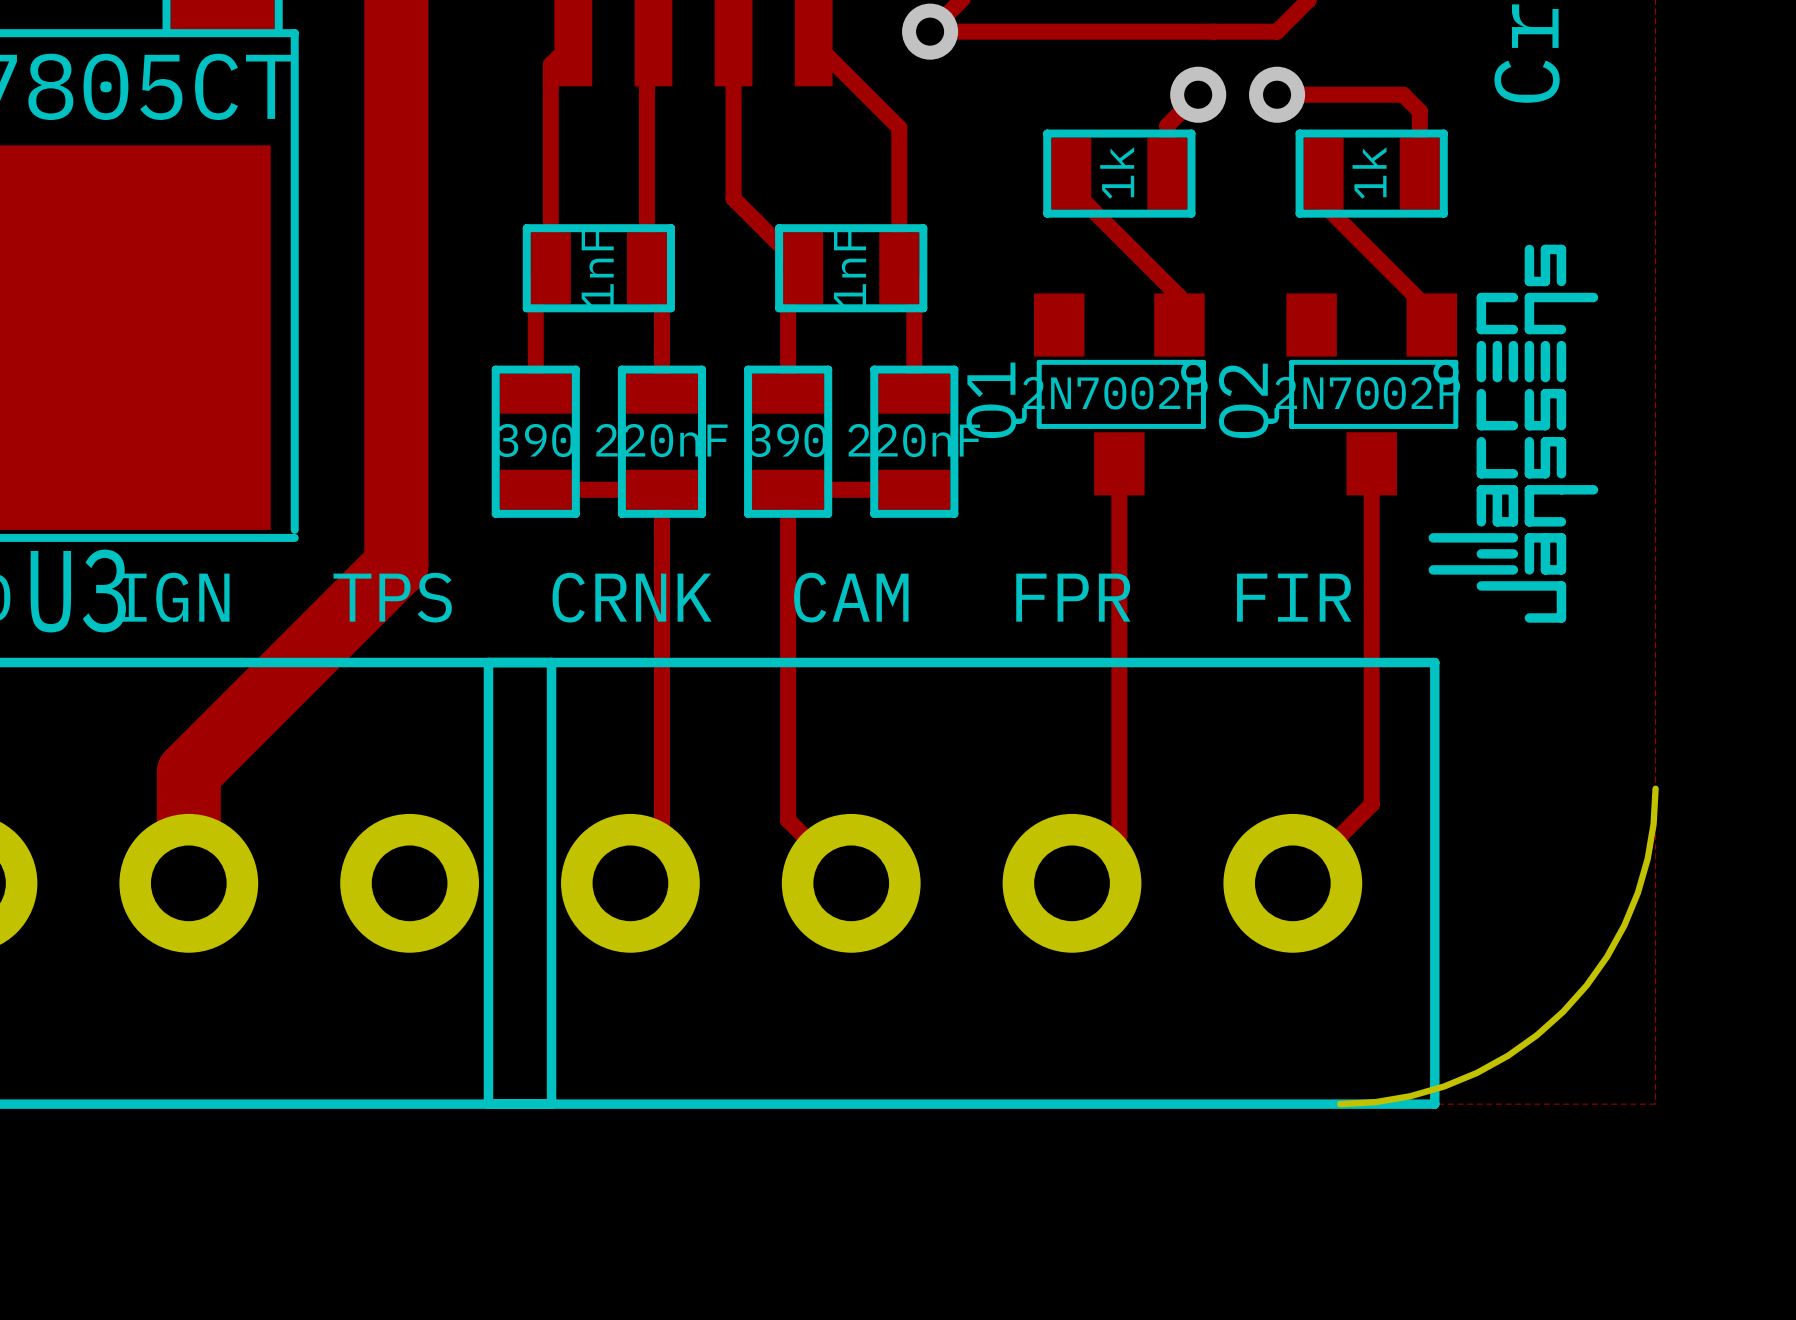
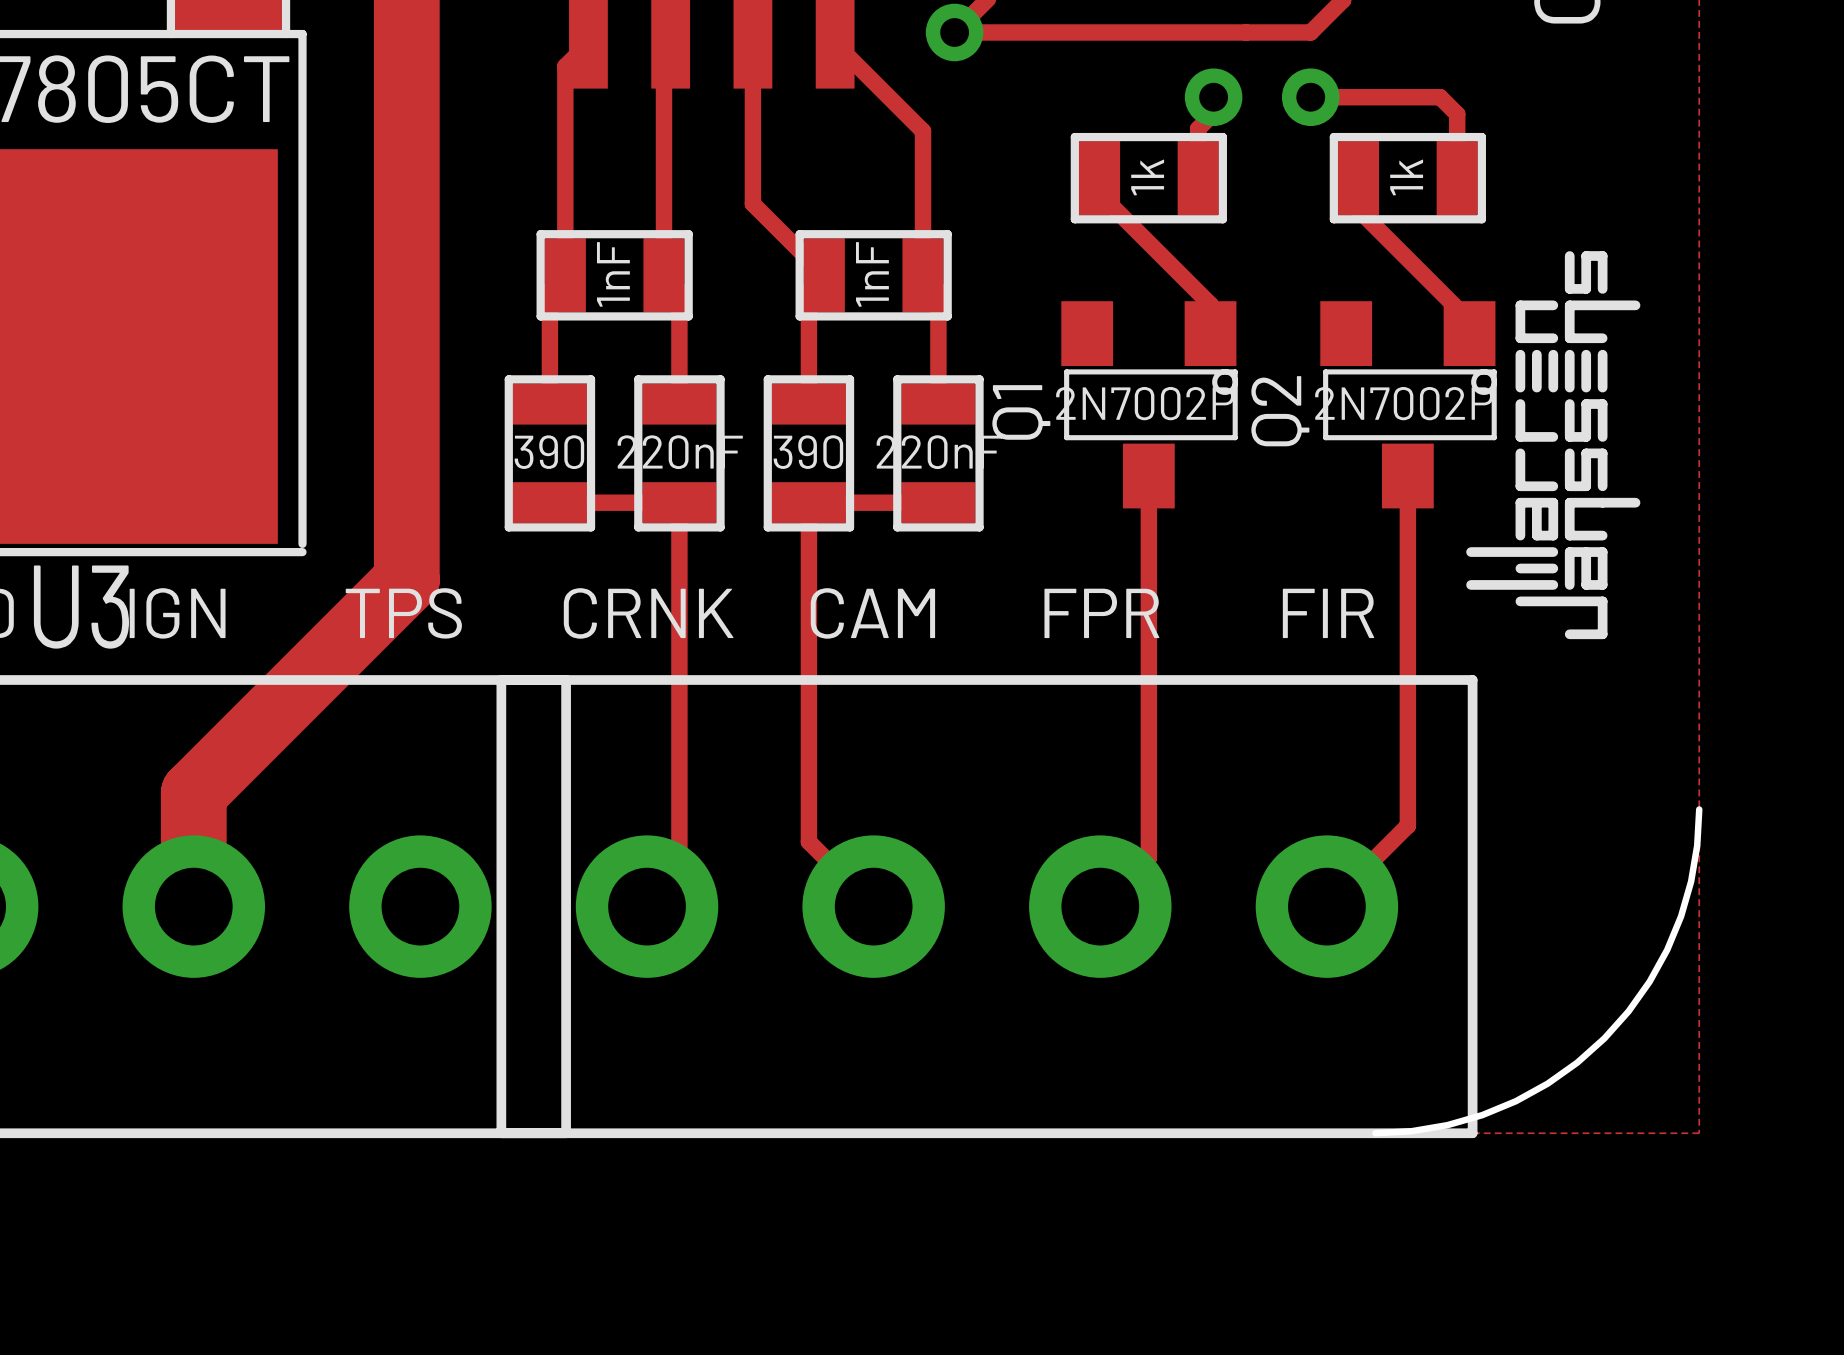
via position: (1198, 94) -> (1213, 97)

